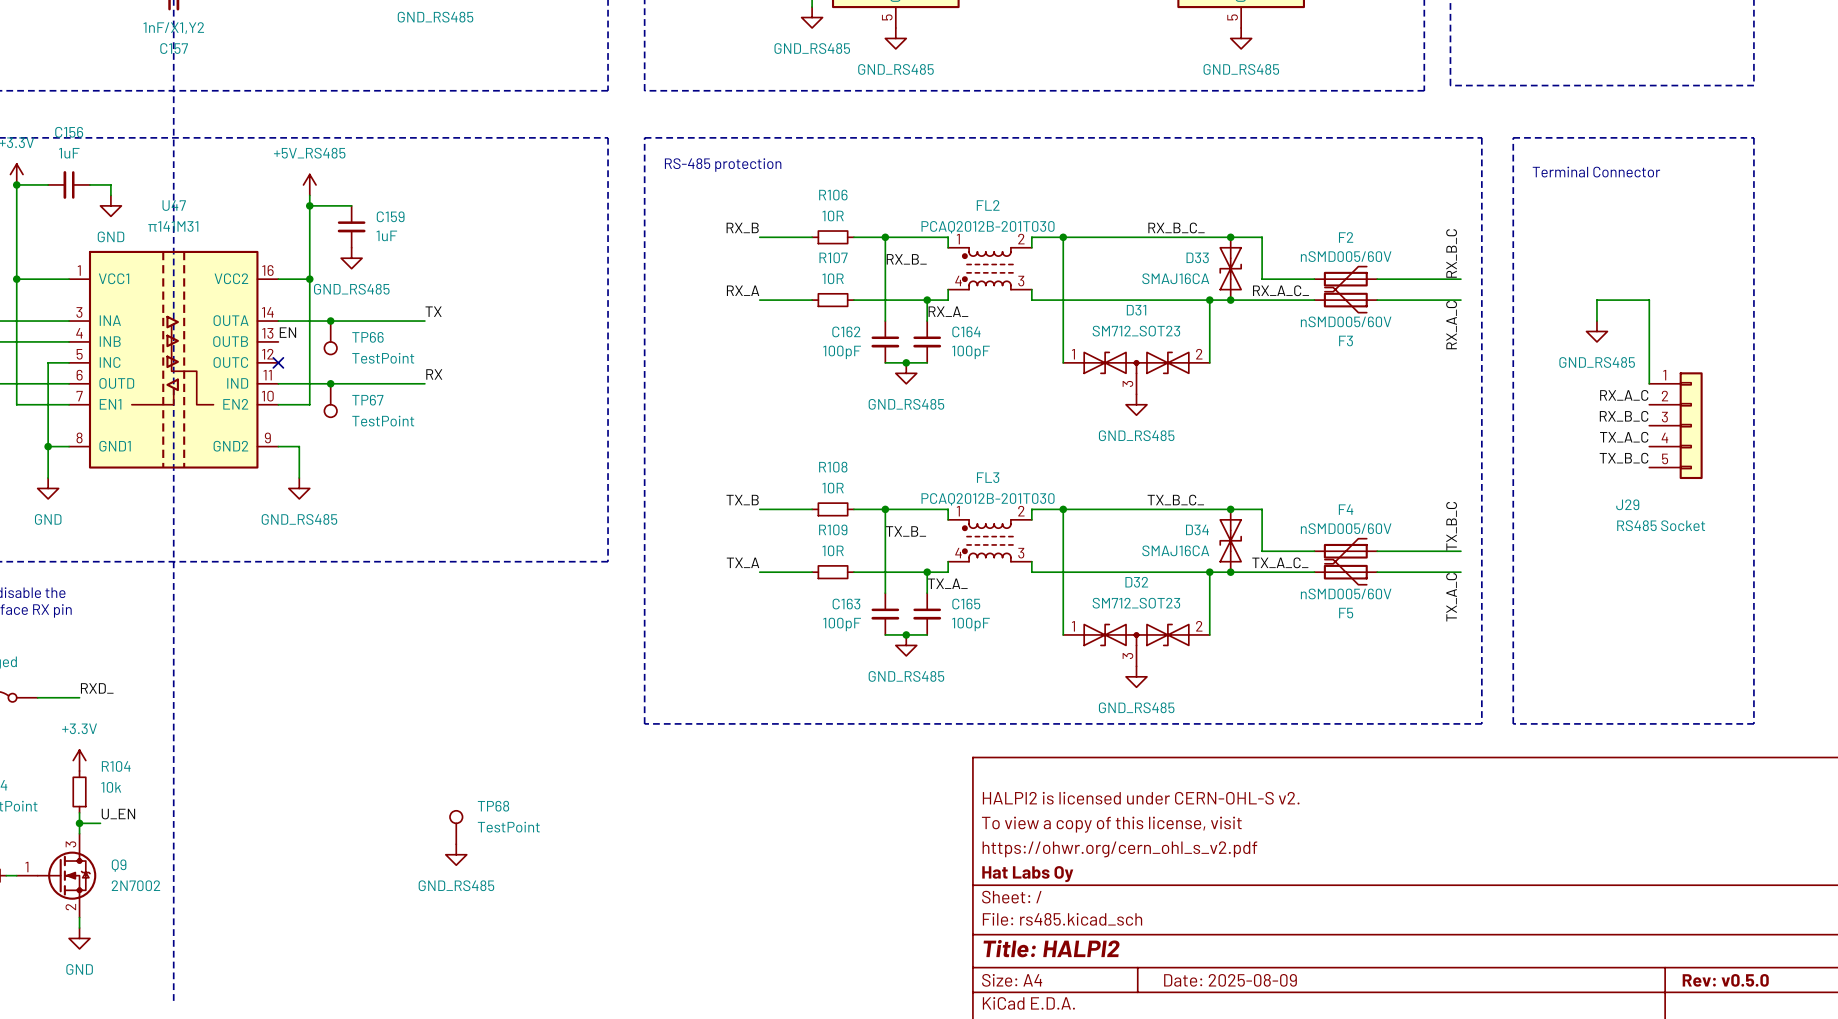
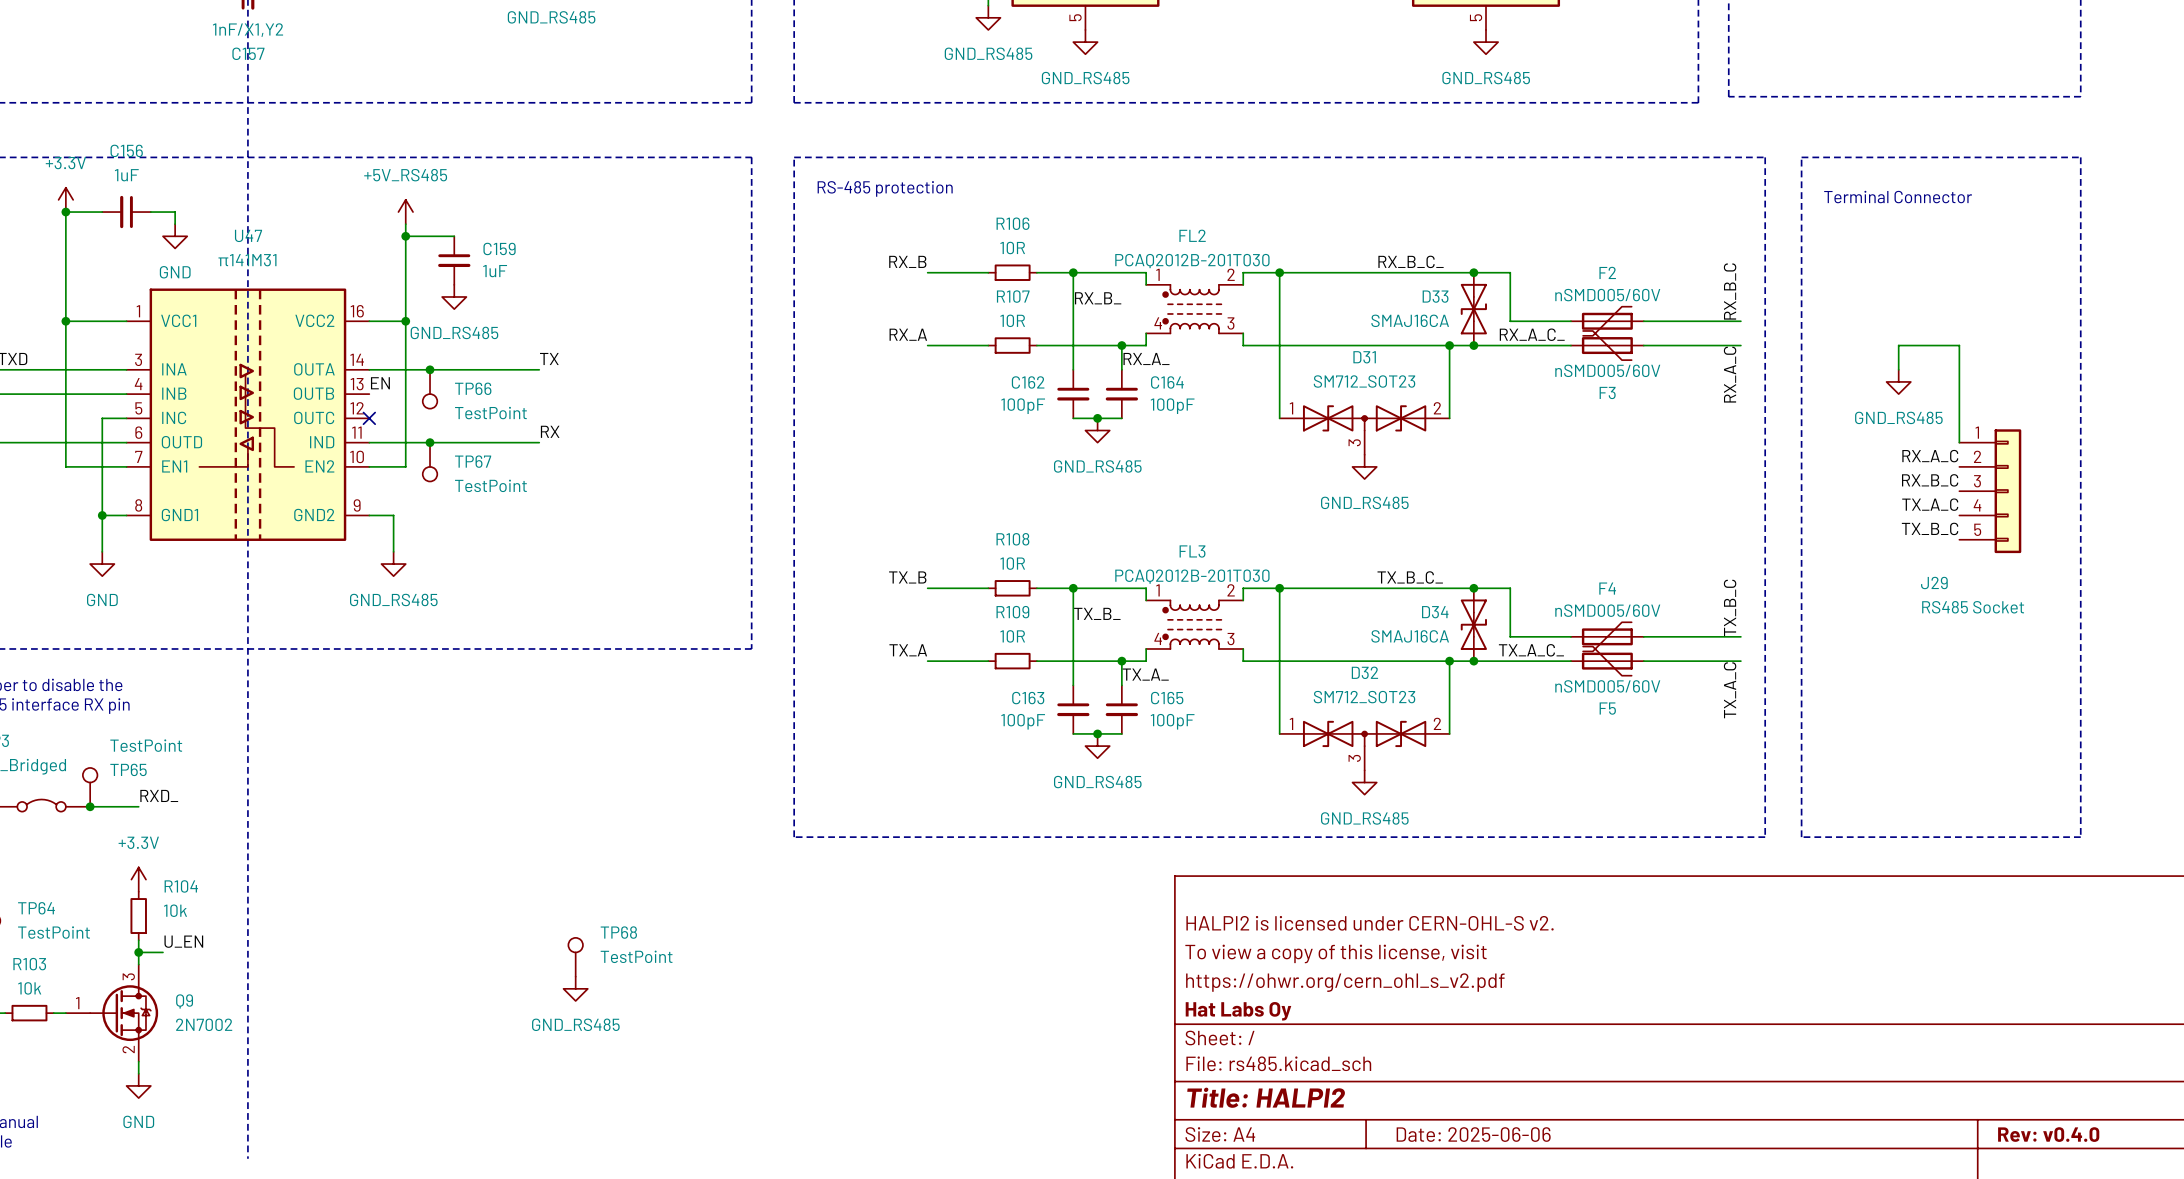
TP65: none -> TestPoint (90, 787)
junction: none -> (90, 806)
title block: Date: 2025-08-09 (1230, 980) -> Date: 2025-06-06 (1473, 1134)
title block: Rev: v0.5.0 (1725, 980) -> Rev: v0.4.0 (2048, 1134)

